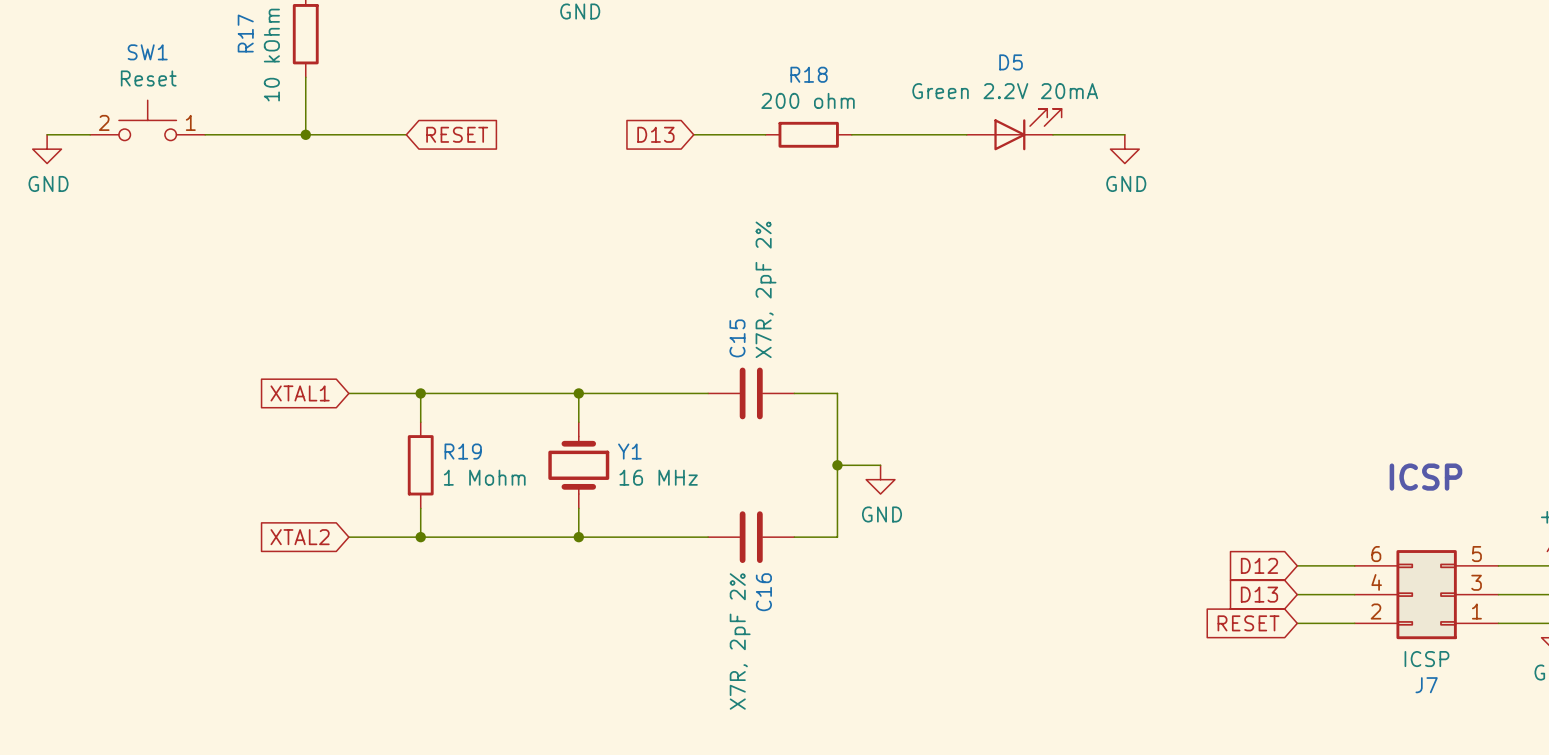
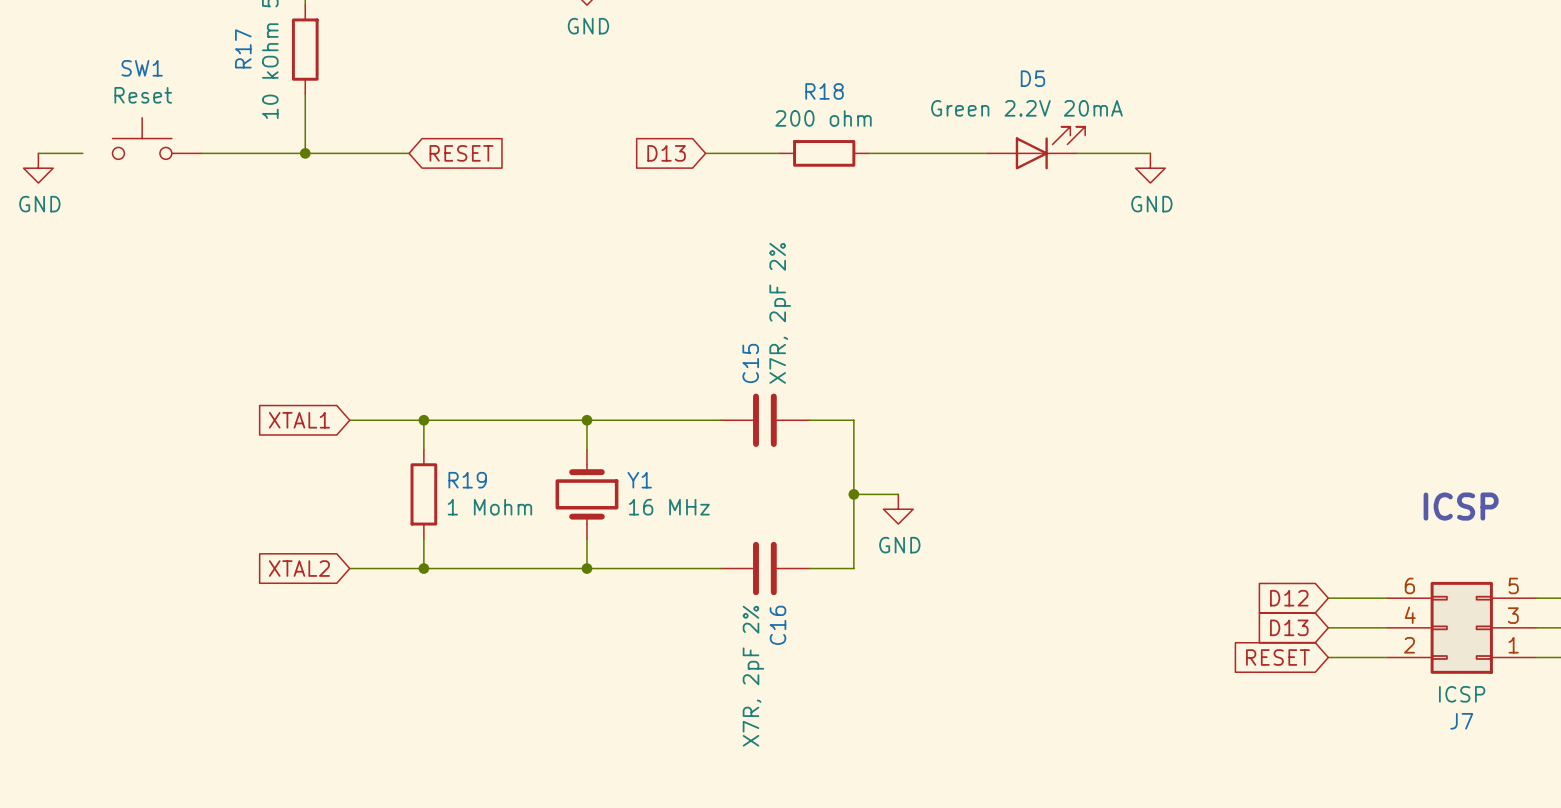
SW1 symbol: [90, 100, 206, 141] -> [112, 117, 202, 160]

